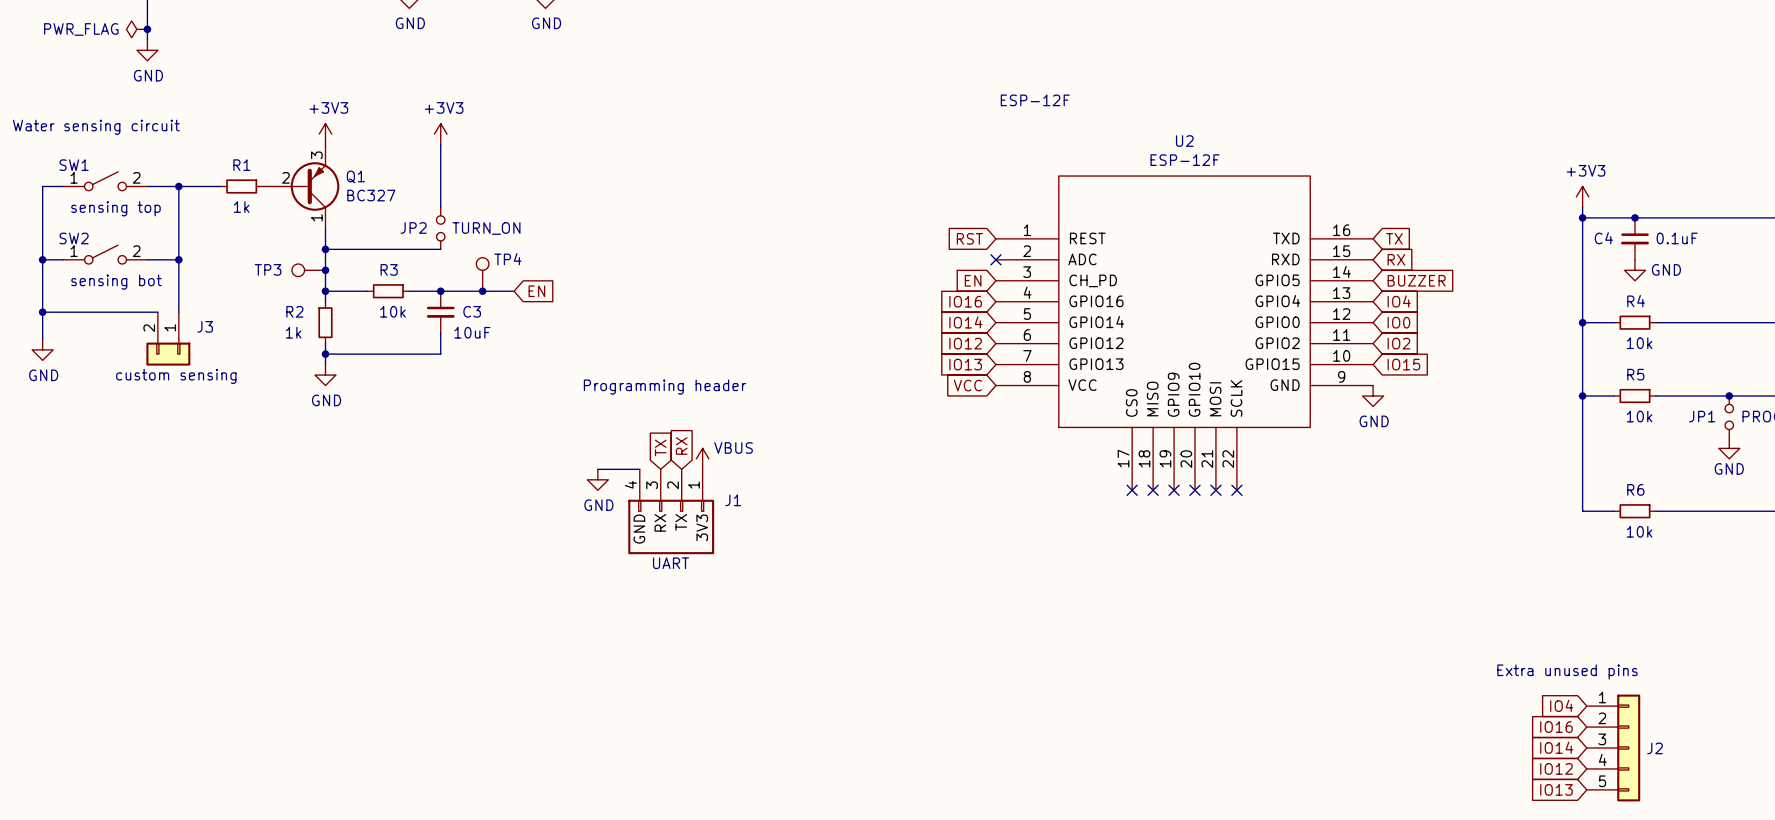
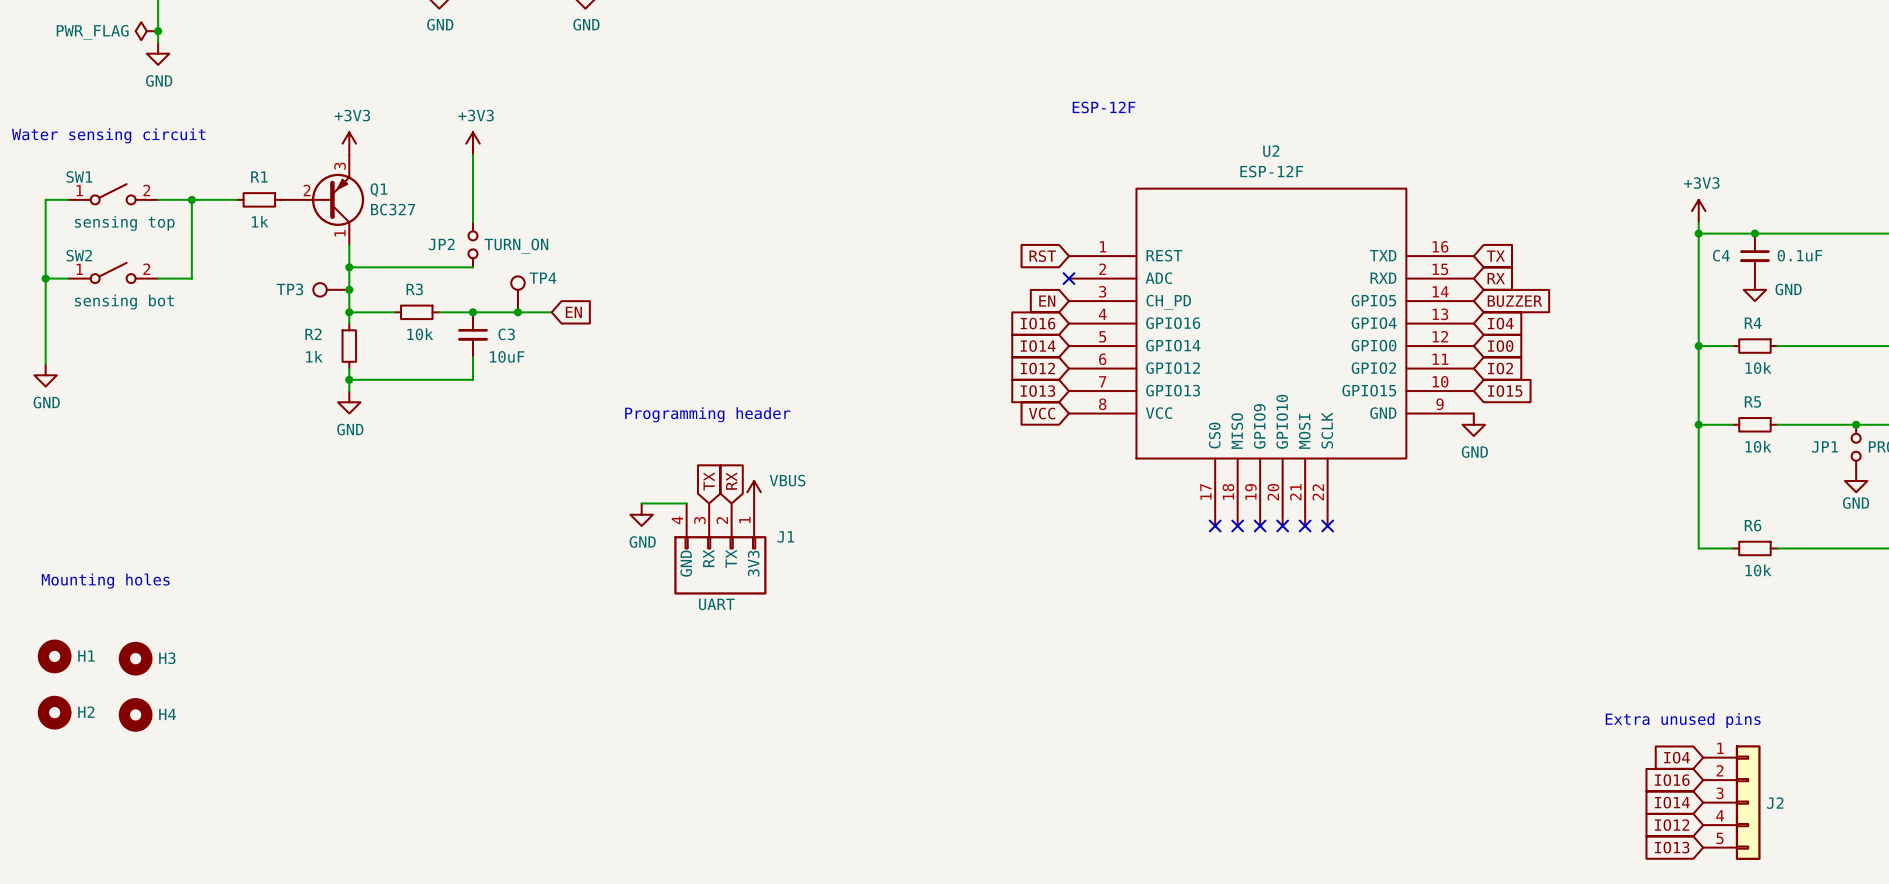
wire: (178, 259) (178, 312) -> none
junction: (178, 259) -> none
wire: (42, 312) (157, 312) -> none
junction: (42, 312) -> none
J3: custom sensing (168, 338) -> none
text: none -> Mounting holes (105, 581)
H1: none -> (54, 656)
H3: none -> (135, 658)
H2: none -> (54, 712)
H4: none -> (135, 714)

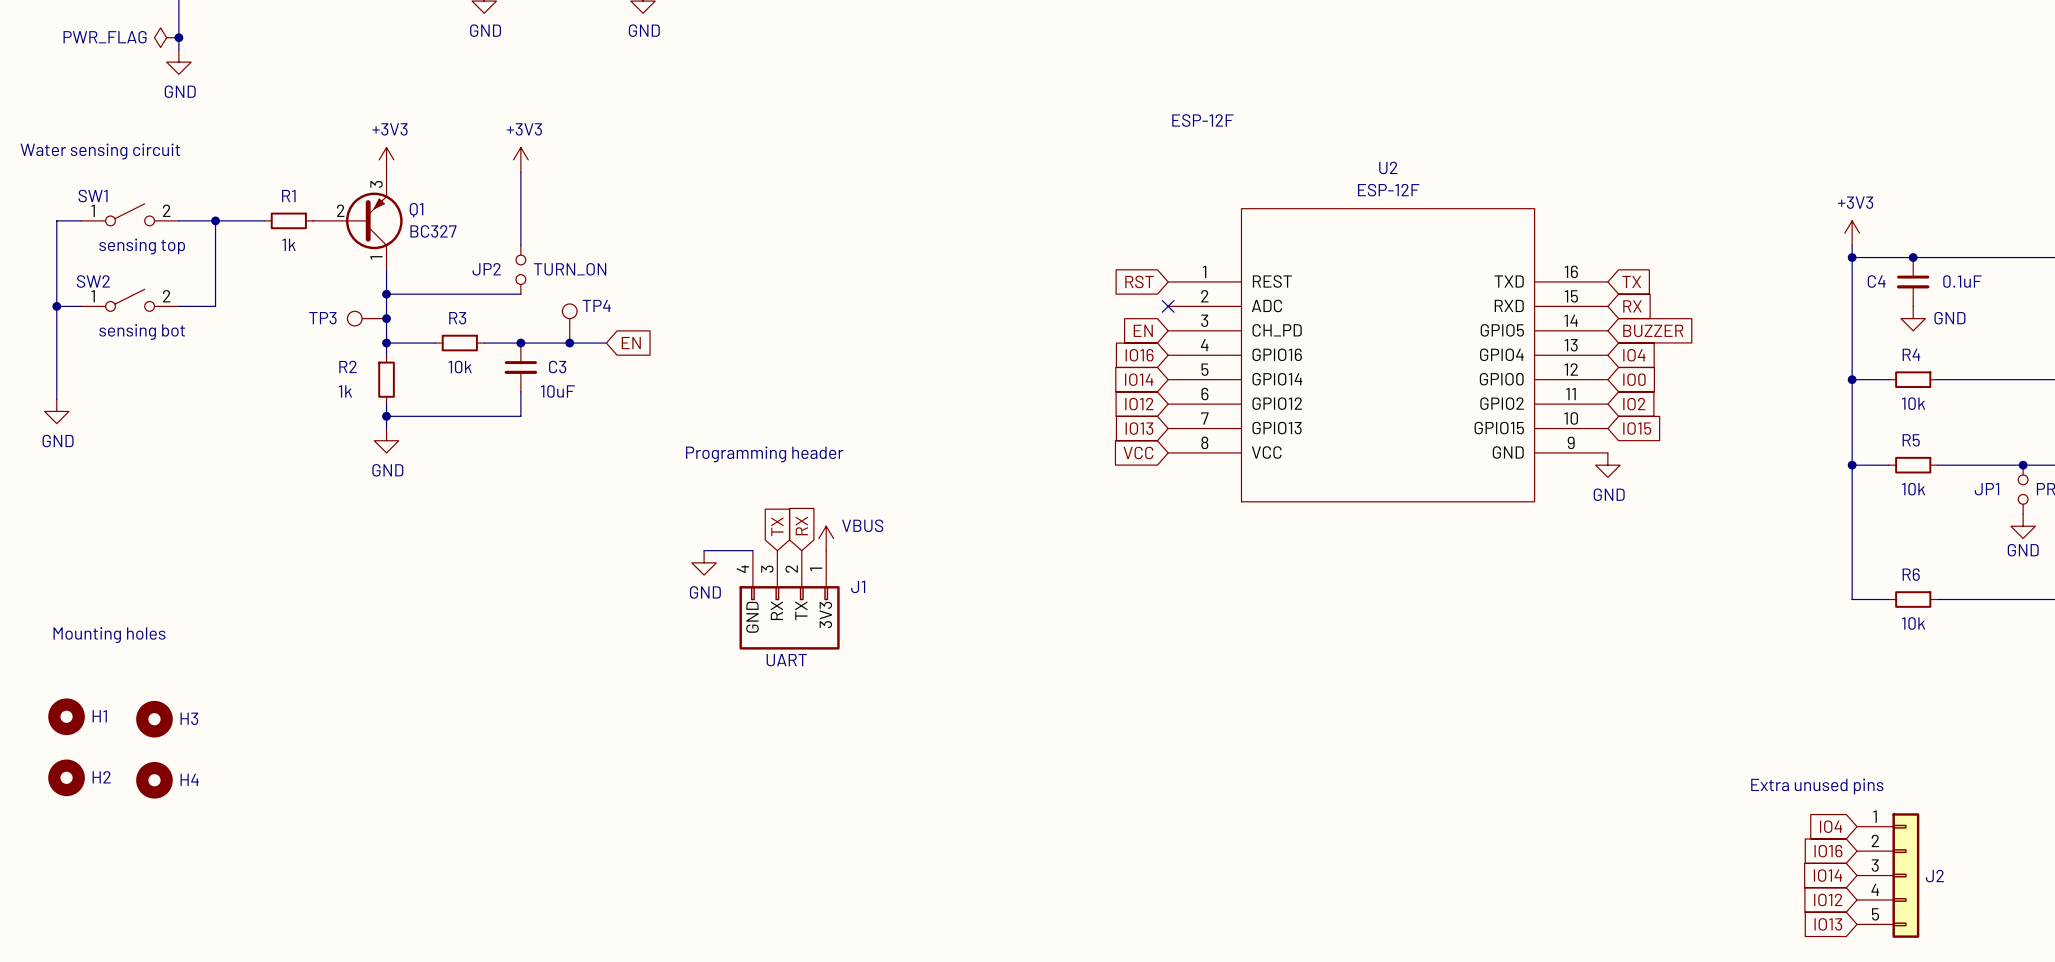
U2 symbol: [1068, 188, 1474, 526] -> [1168, 208, 1608, 502]
no-connect mark: (1215, 525) -> none
no-connect mark: (1237, 525) -> none
no-connect mark: (1260, 525) -> none
no-connect mark: (1282, 525) -> none
no-connect mark: (1305, 525) -> none
no-connect mark: (1327, 525) -> none

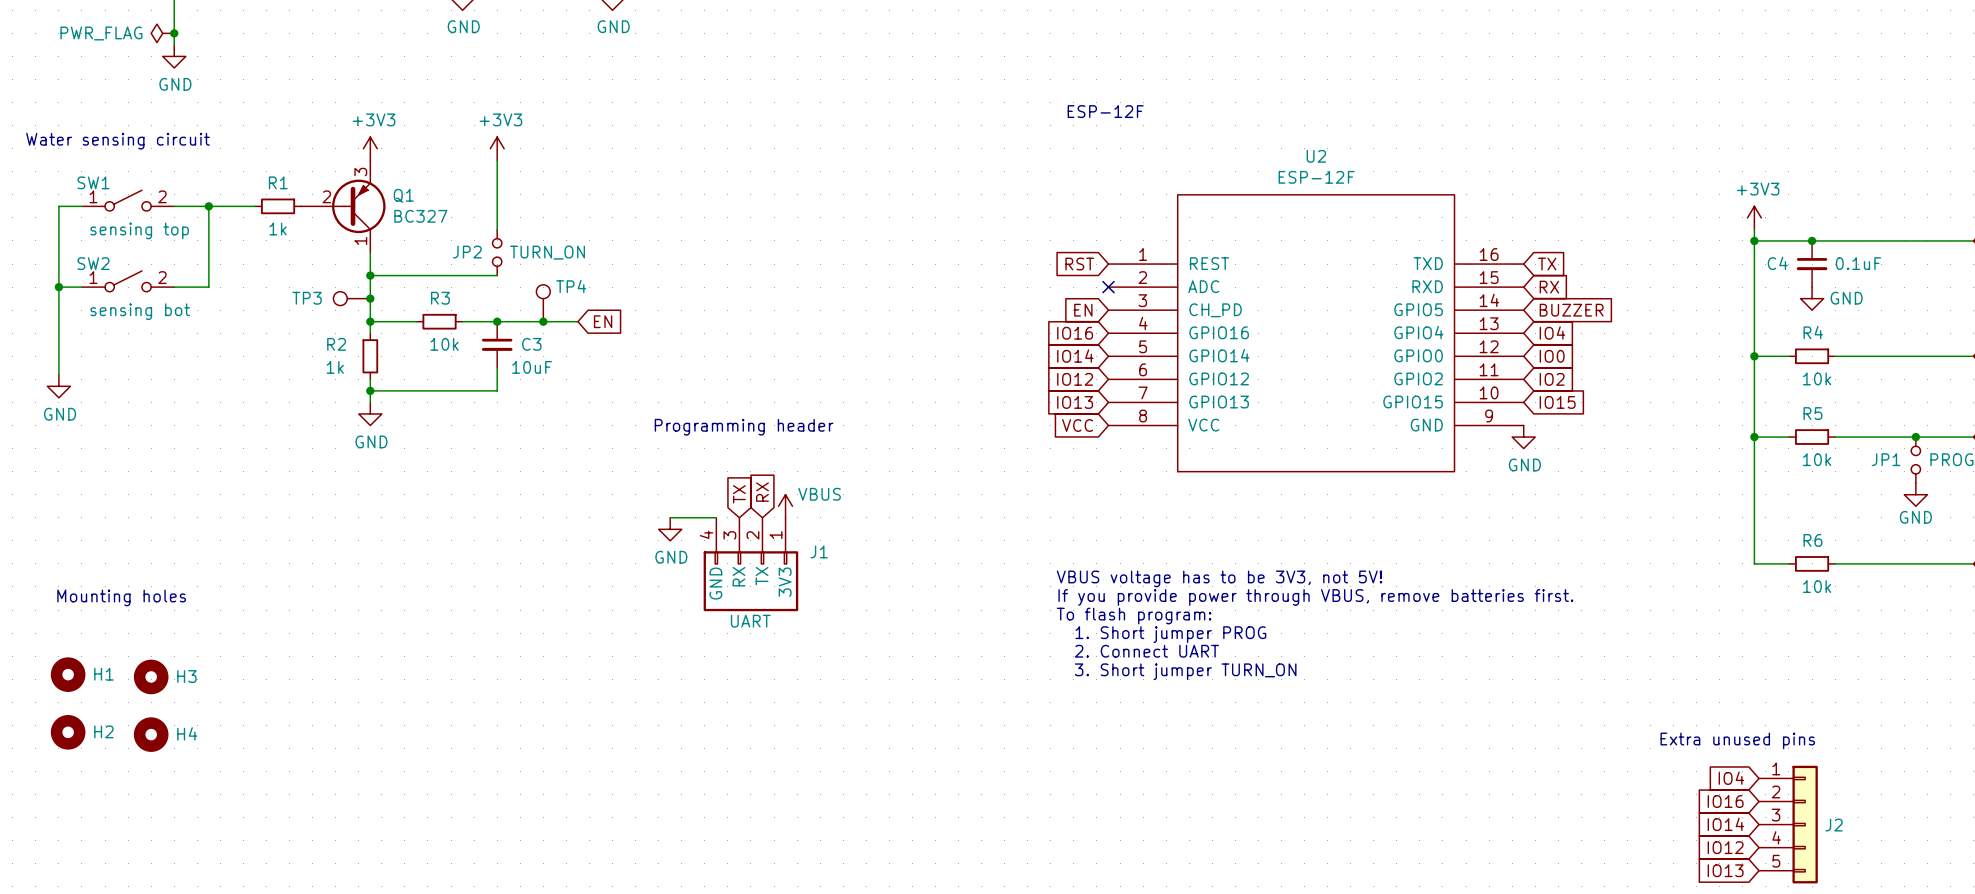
text position: ESP-12F (1202, 120) -> ESP-12F (1105, 111)
text: none -> VBUS voltage has to be 3V3, not 5V! (1219, 578)
text: none -> If you provide power through VBUS, remove batteries first. (1315, 597)
text: none -> To flash program: (1134, 616)
text: none -> 1. Short jumper PROG (1170, 634)
text: none -> 2. Connect UART (1146, 651)
text: none -> 3. Short jumper TURN_ON (1185, 671)

